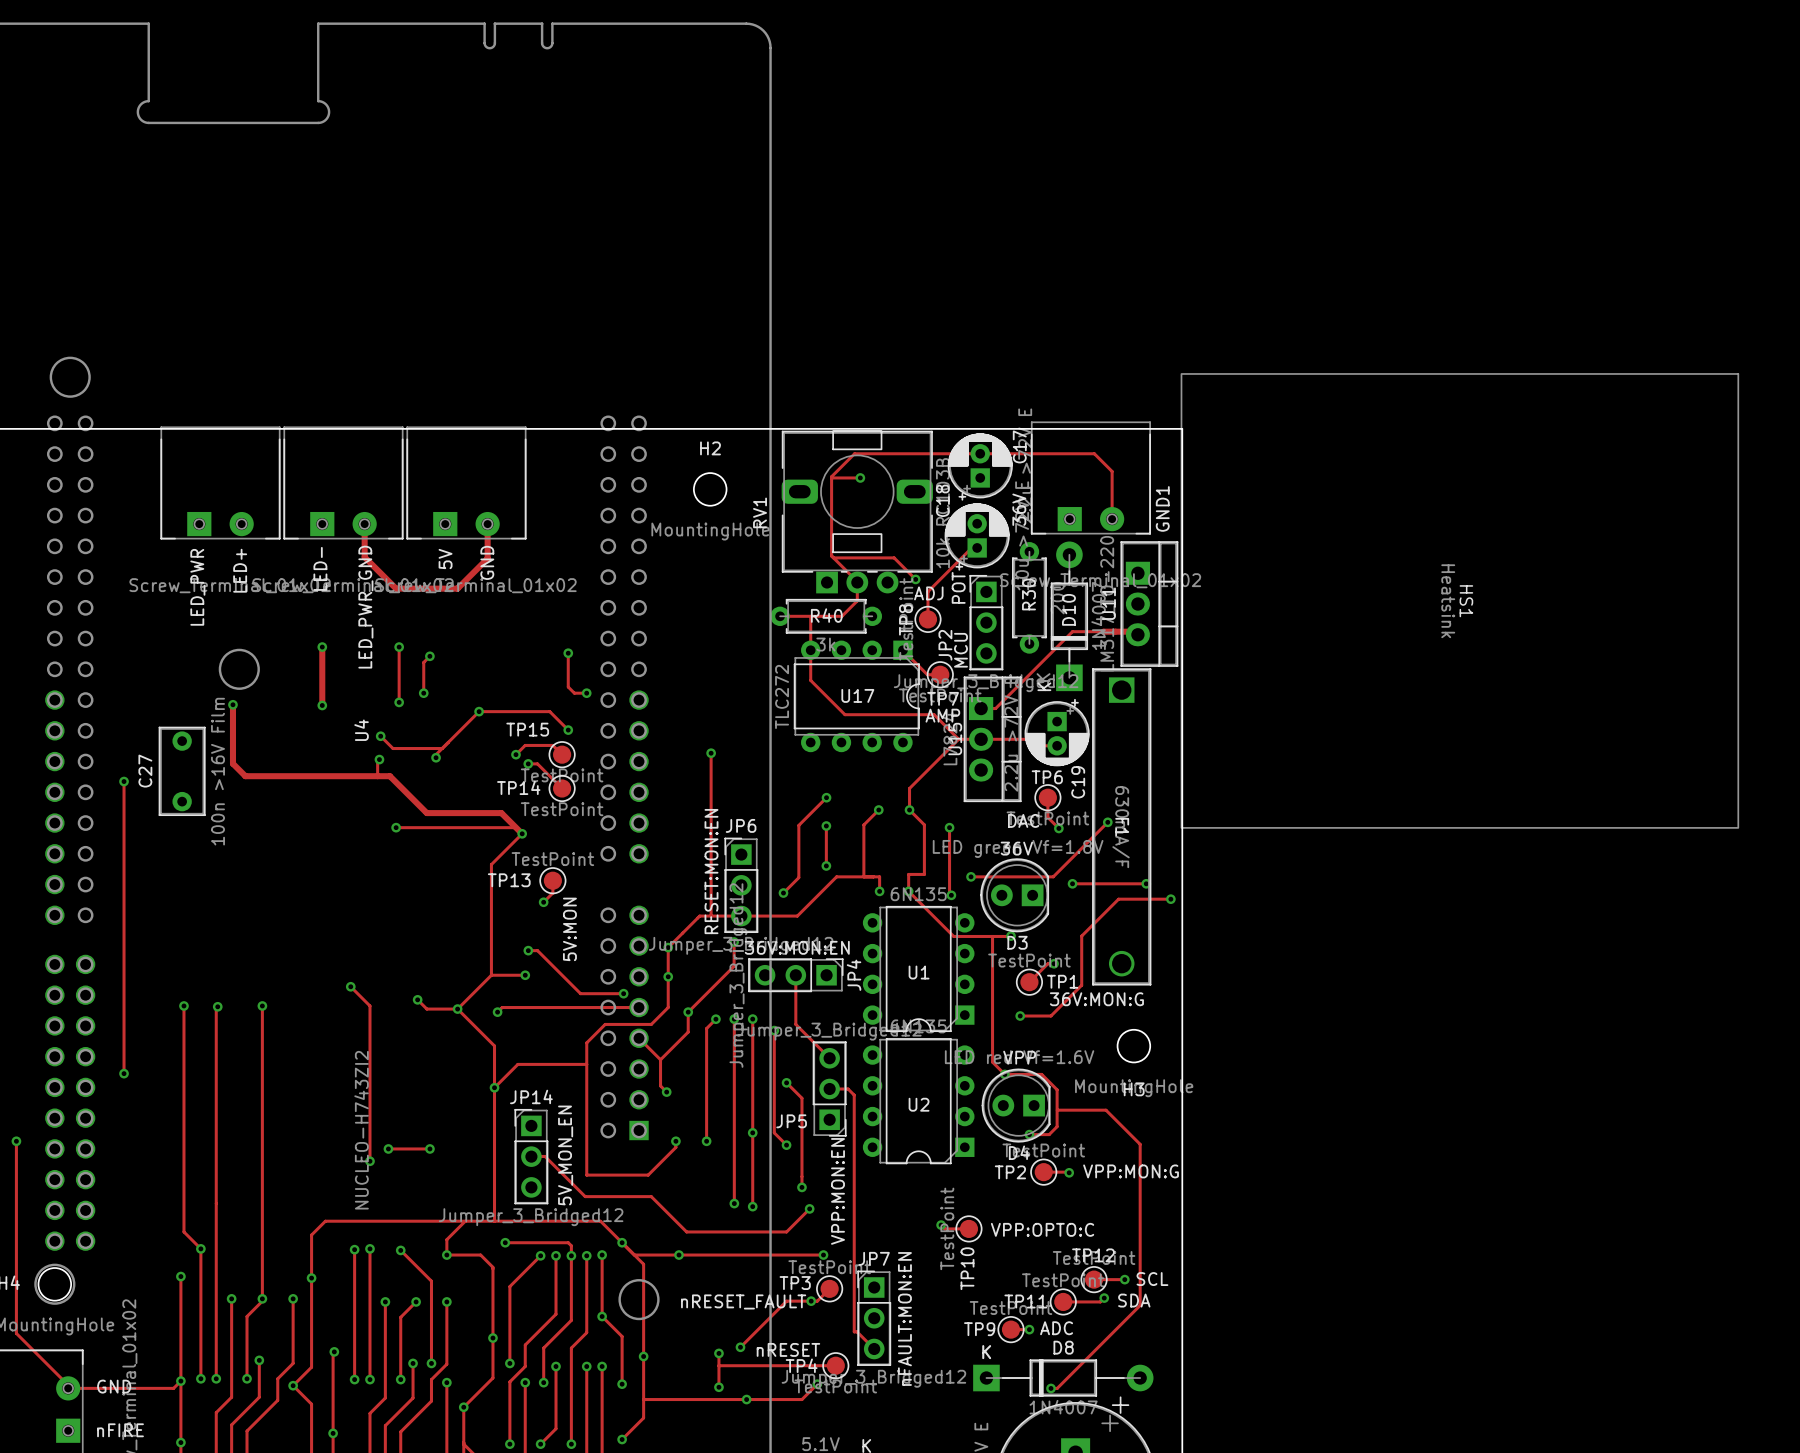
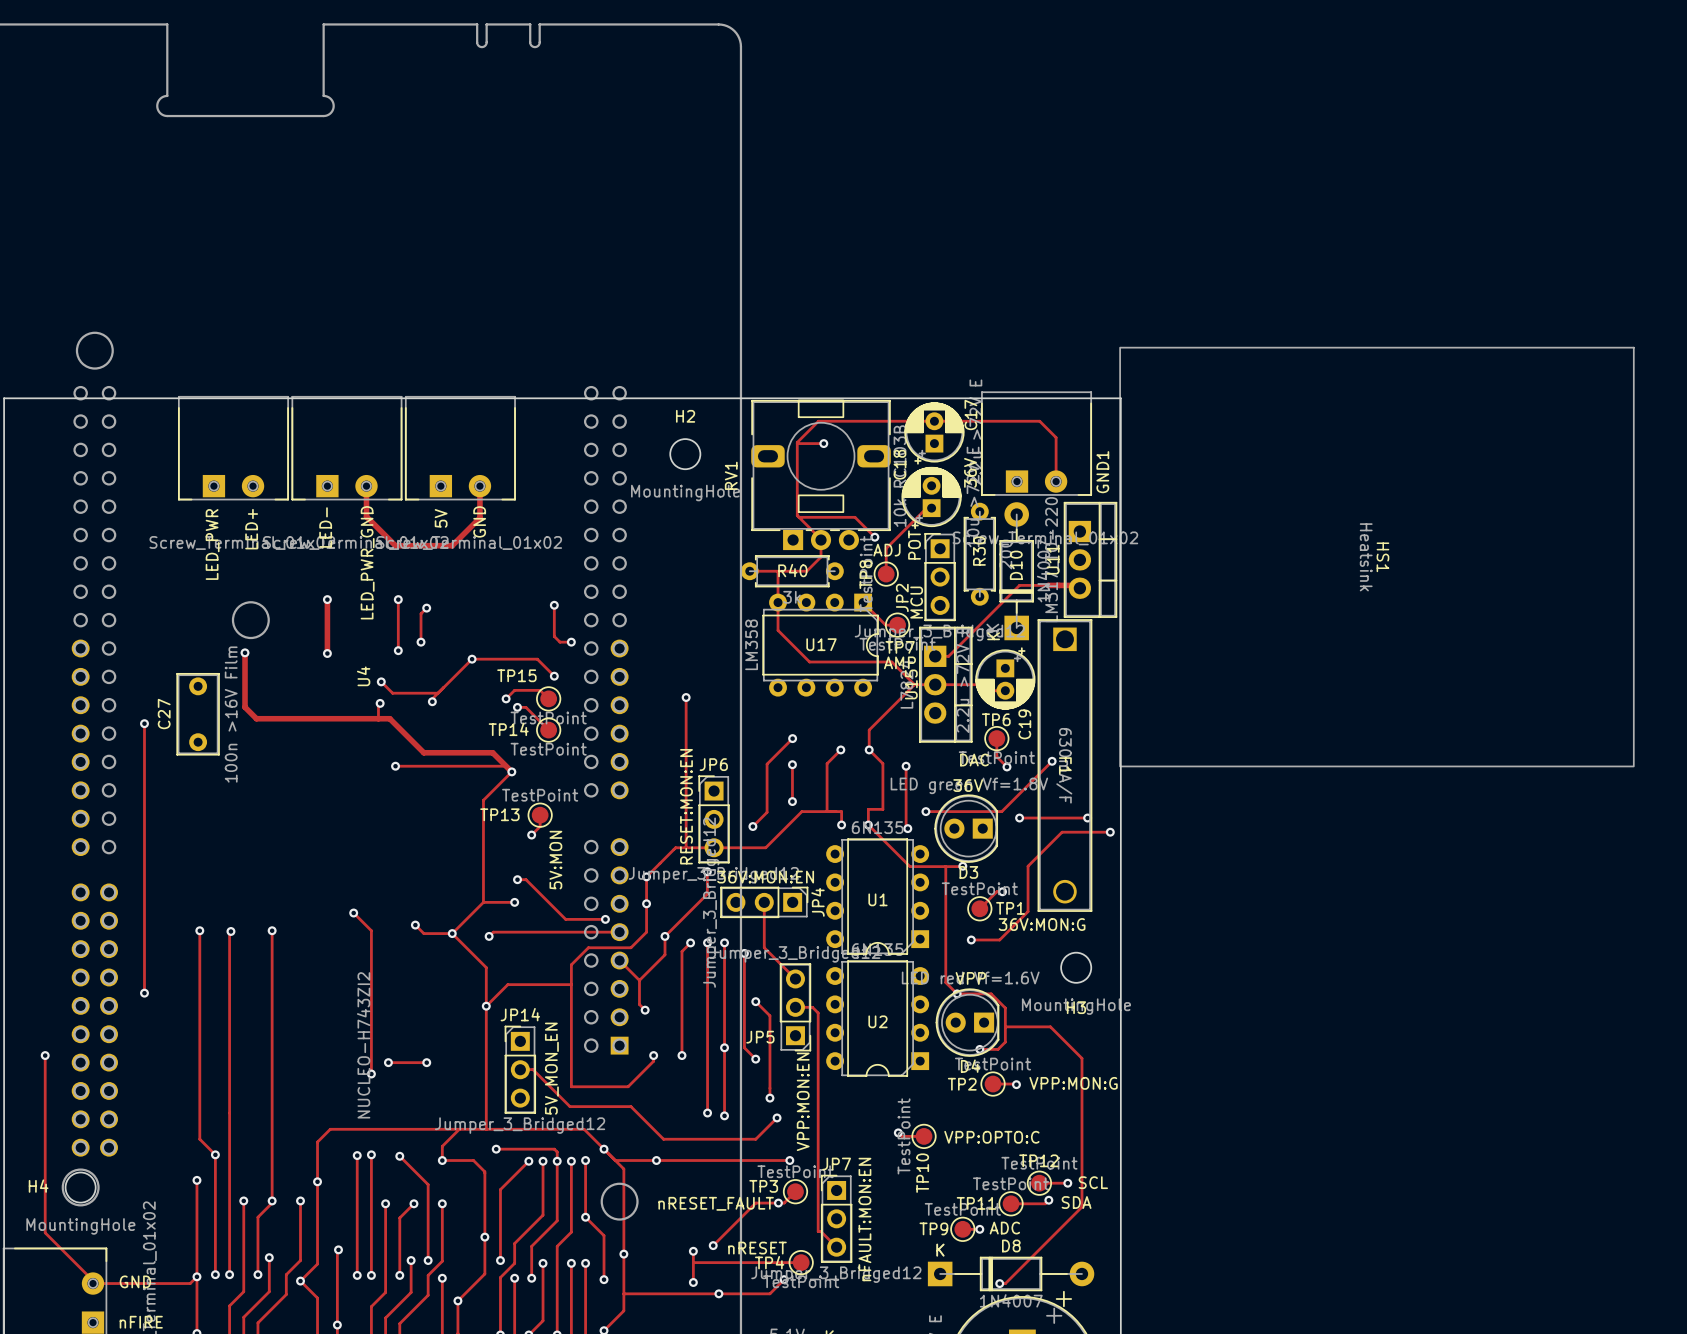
U17 value: TLC272 (782, 696) -> LM358 (751, 644)

